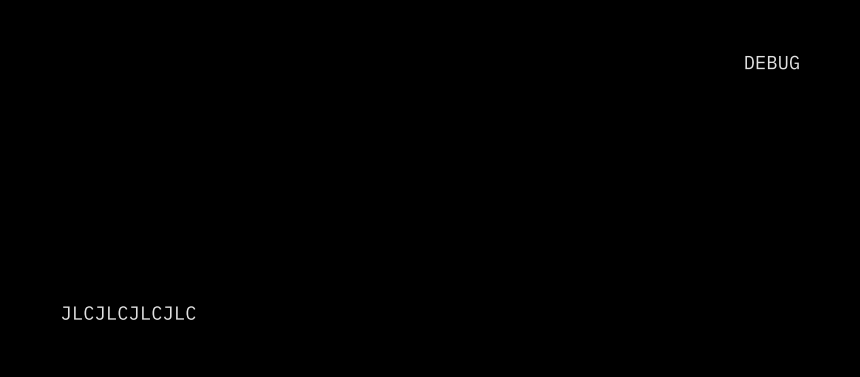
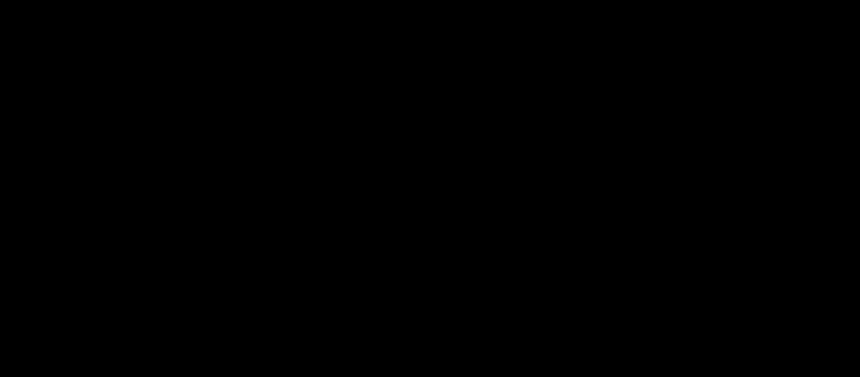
text: DEBUG (772, 62) -> none
text: JLCJLCJLCJLC (128, 313) -> none

